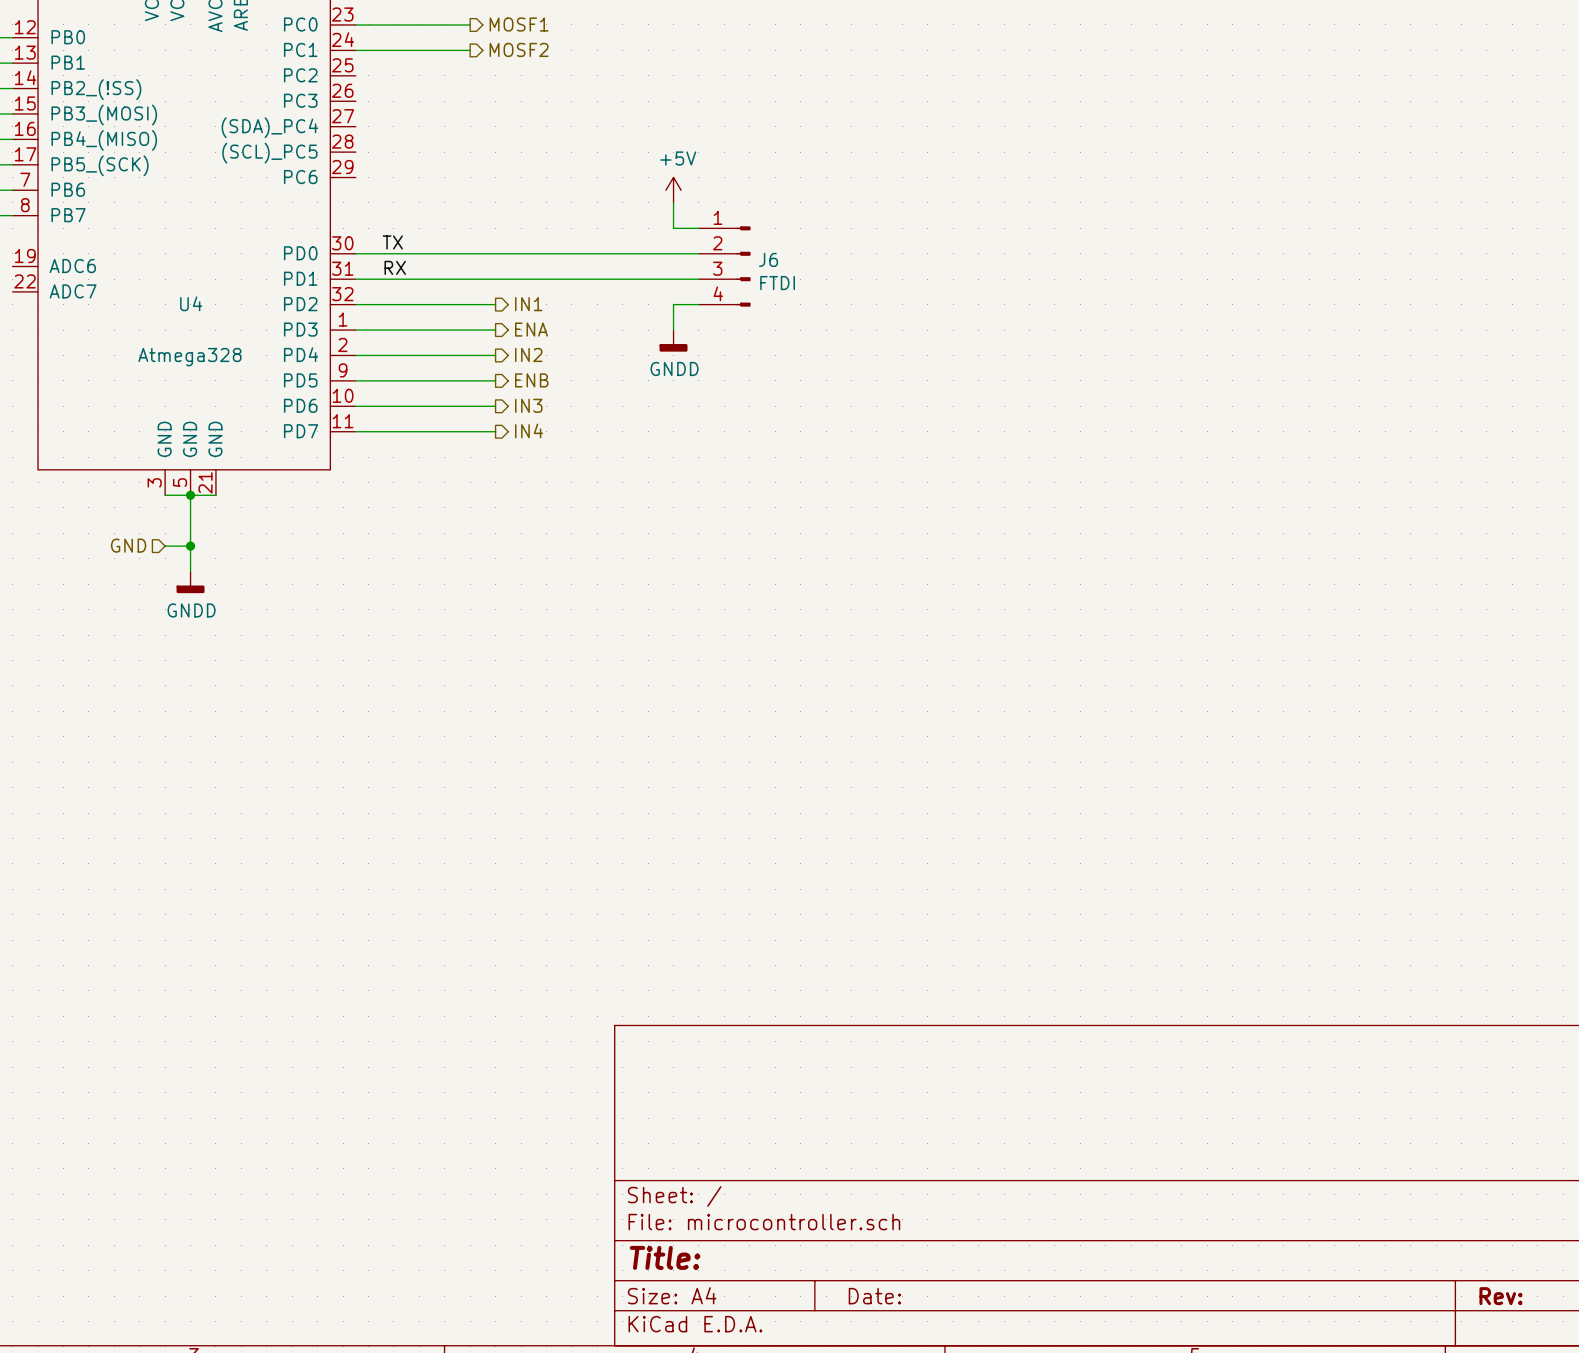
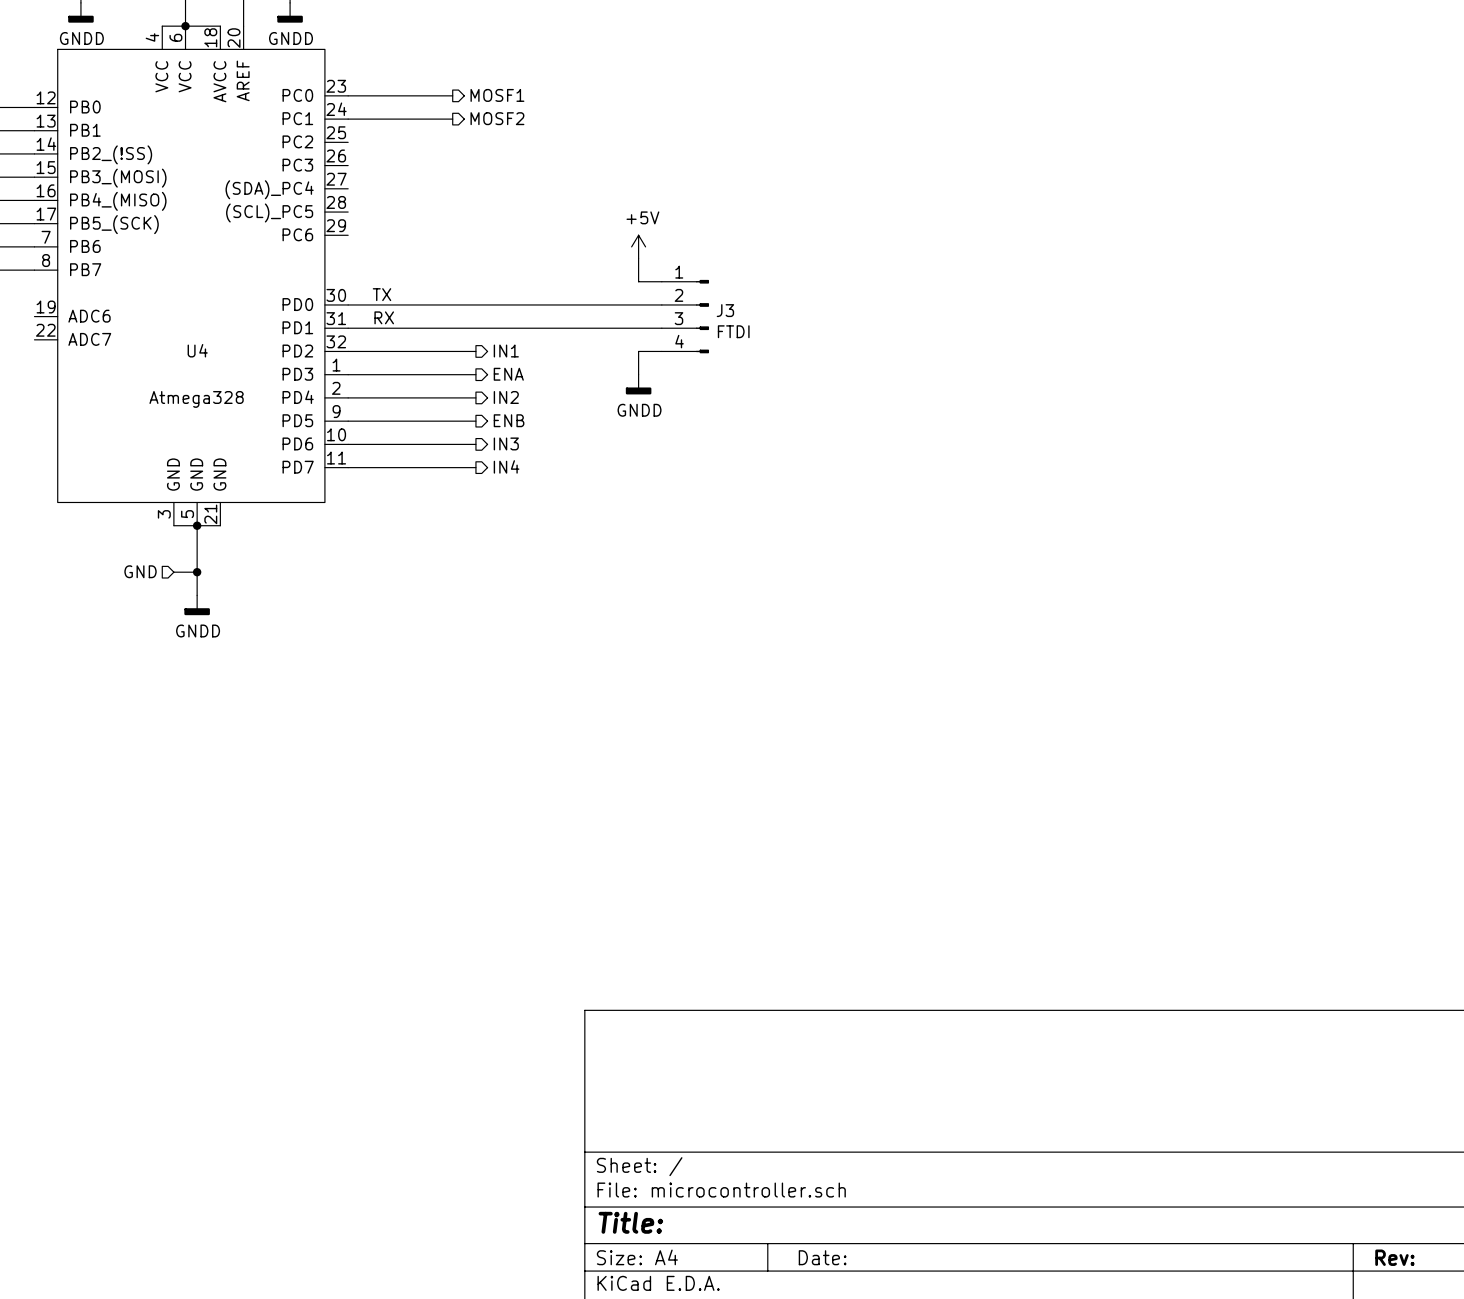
J6 name: J6 (768, 259) -> J3 (725, 310)

